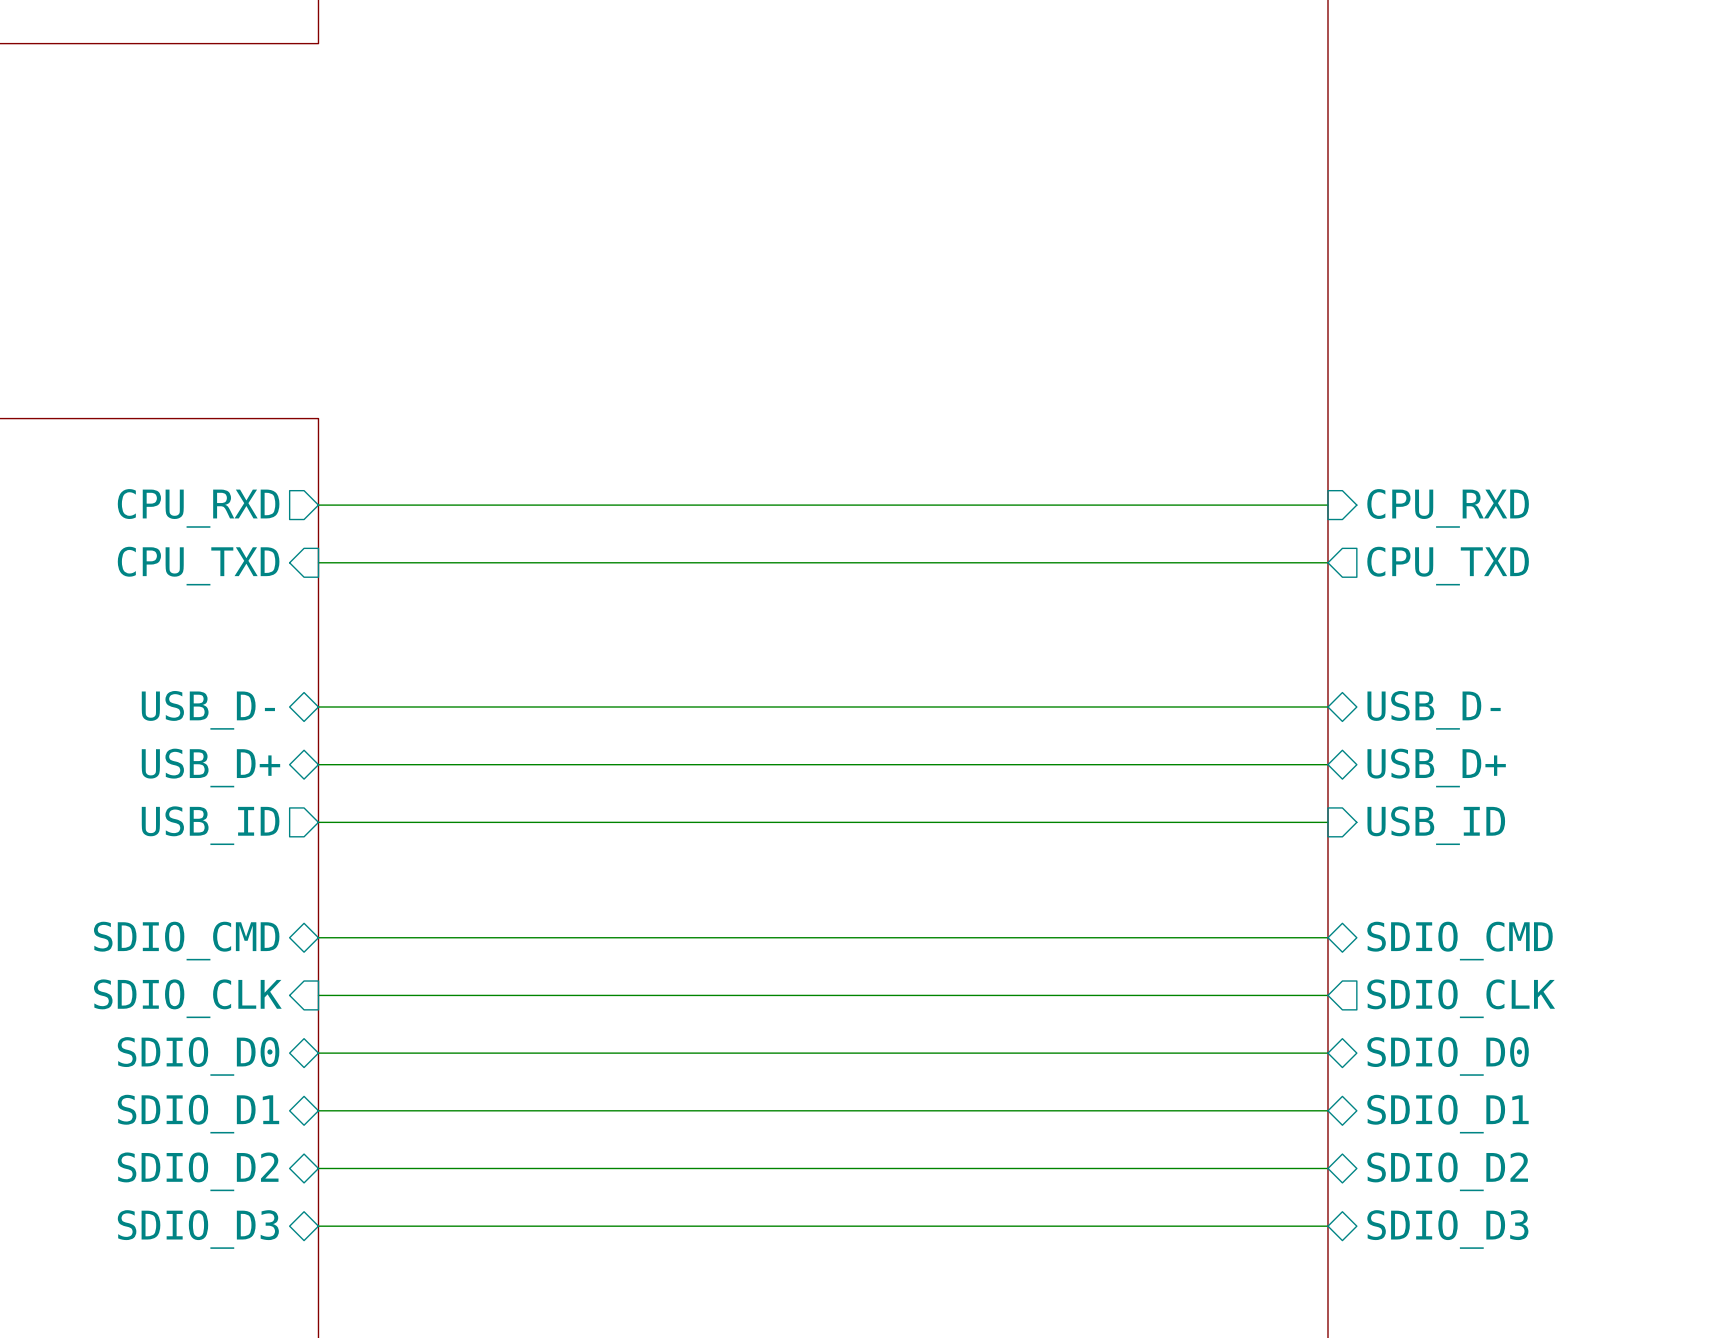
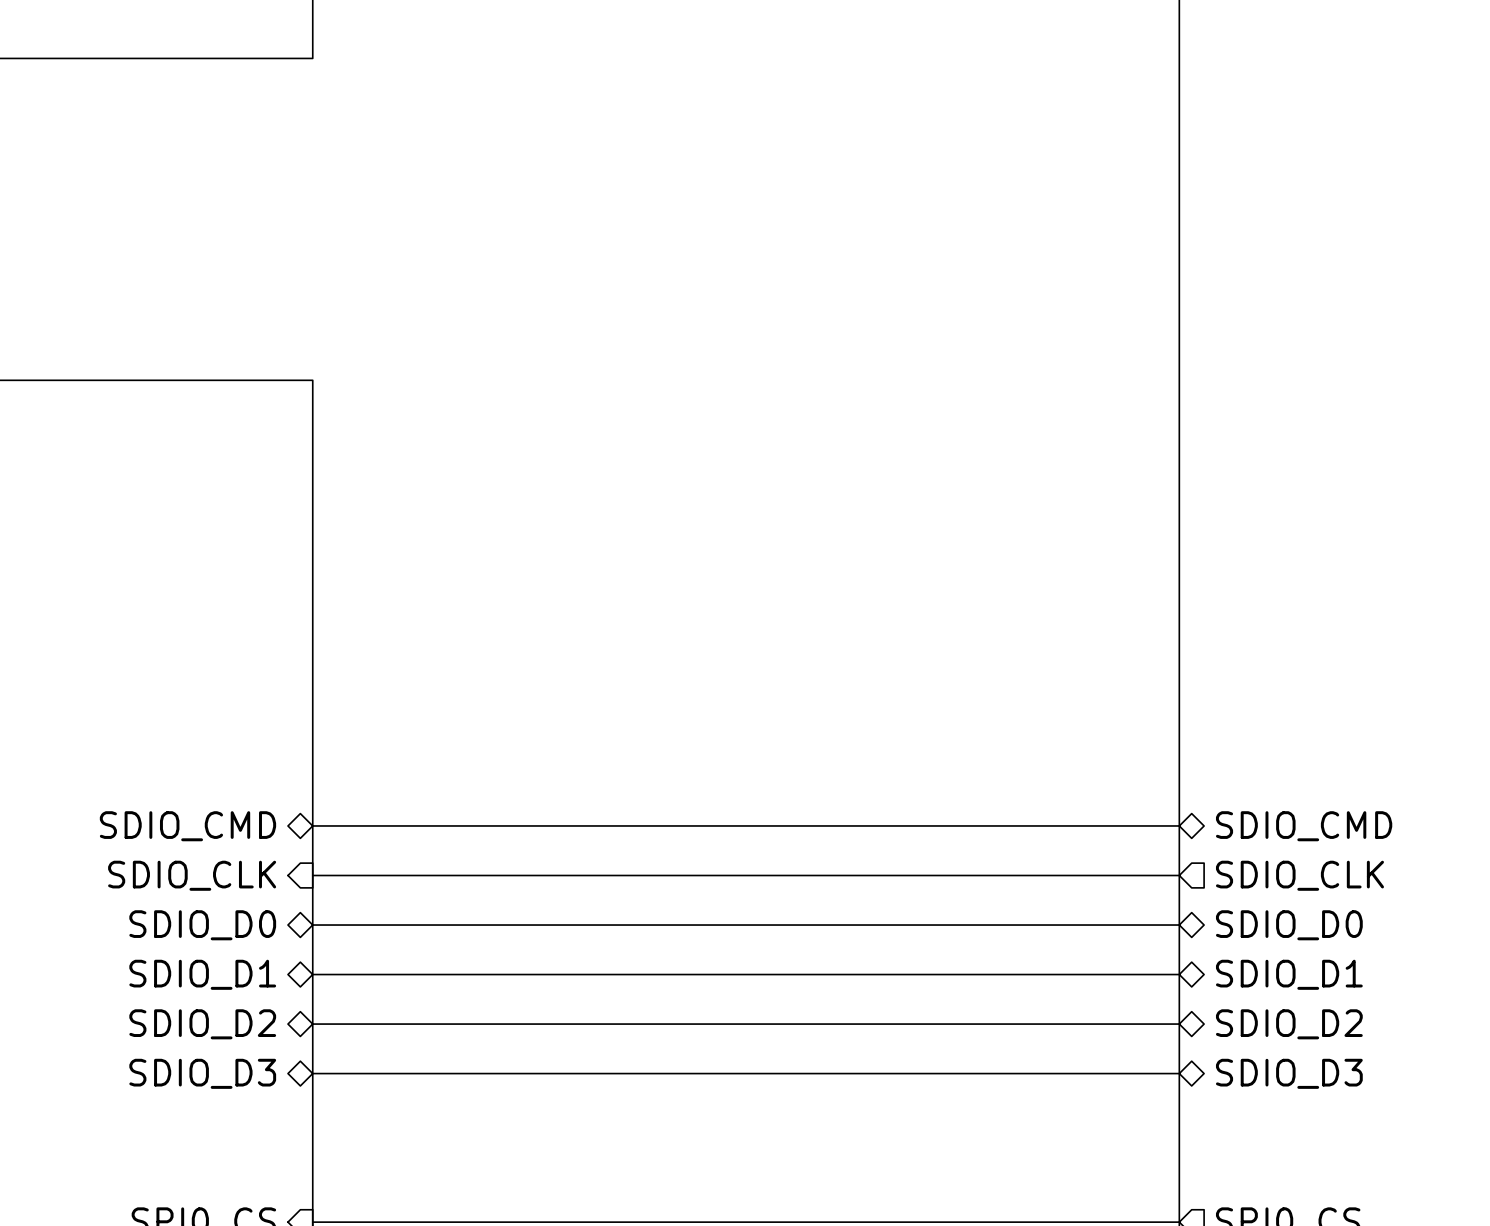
wire: (318, 505) (1328, 505) -> none
sheet pin: CPU_RXD (198, 508) -> none
sheet pin: CPU_RXD (1448, 508) -> none
wire: (318, 562) (1328, 562) -> none
sheet pin: CPU_TXD (198, 566) -> none
sheet pin: CPU_TXD (1448, 566) -> none
wire: (318, 707) (1328, 707) -> none
sheet pin: USB_D- (208, 710) -> none
sheet pin: USB_D- (1434, 710) -> none
wire: (318, 764) (1328, 764) -> none
sheet pin: USB_D+ (210, 768) -> none
sheet pin: USB_D+ (1436, 768) -> none
wire: (318, 822) (1328, 822) -> none
sheet pin: USB_ID (210, 825) -> none
sheet pin: USB_ID (1436, 825) -> none

